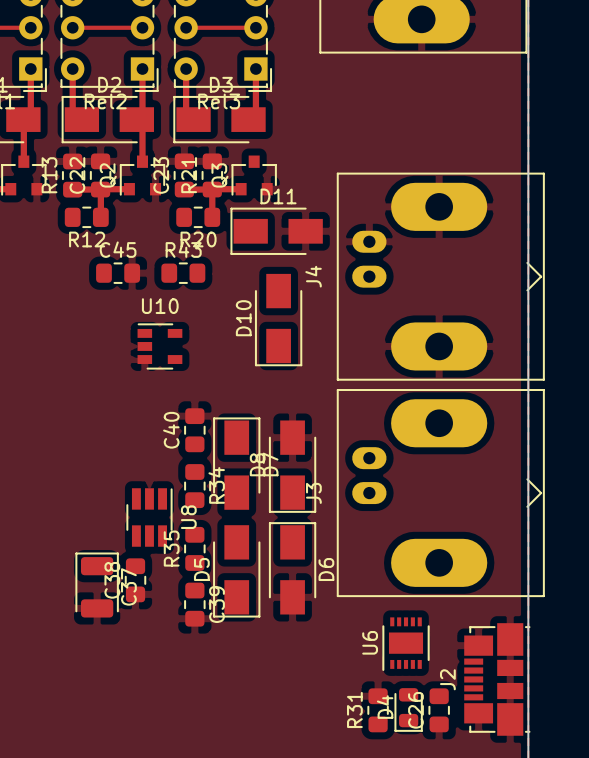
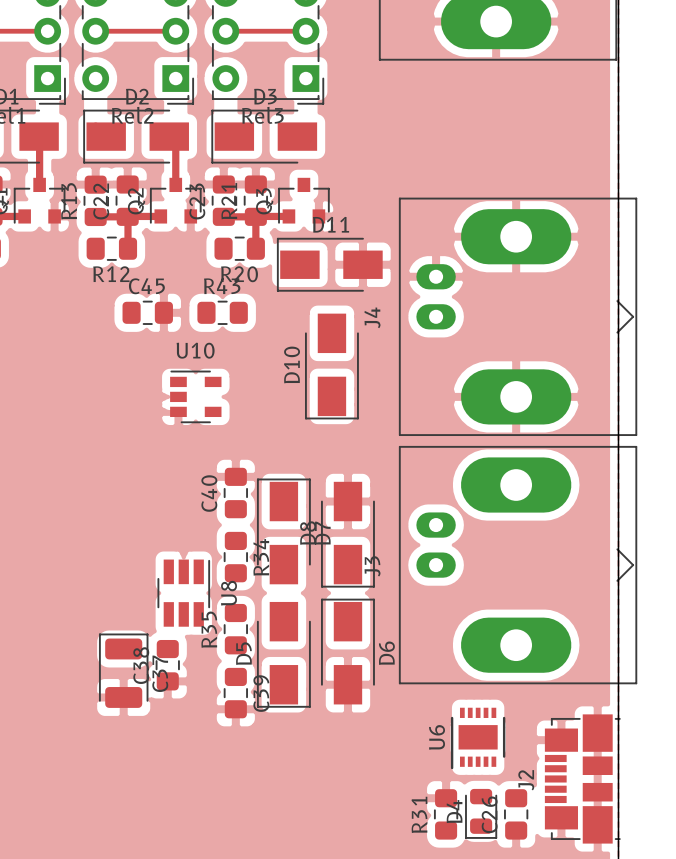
track: (30, 68) (30, 112) -> none
track: (72, 68) (72, 110) -> none
track: (142, 68) (142, 113) -> none
track: (186, 68) (186, 112) -> none
track: (255, 68) (255, 112) -> none

